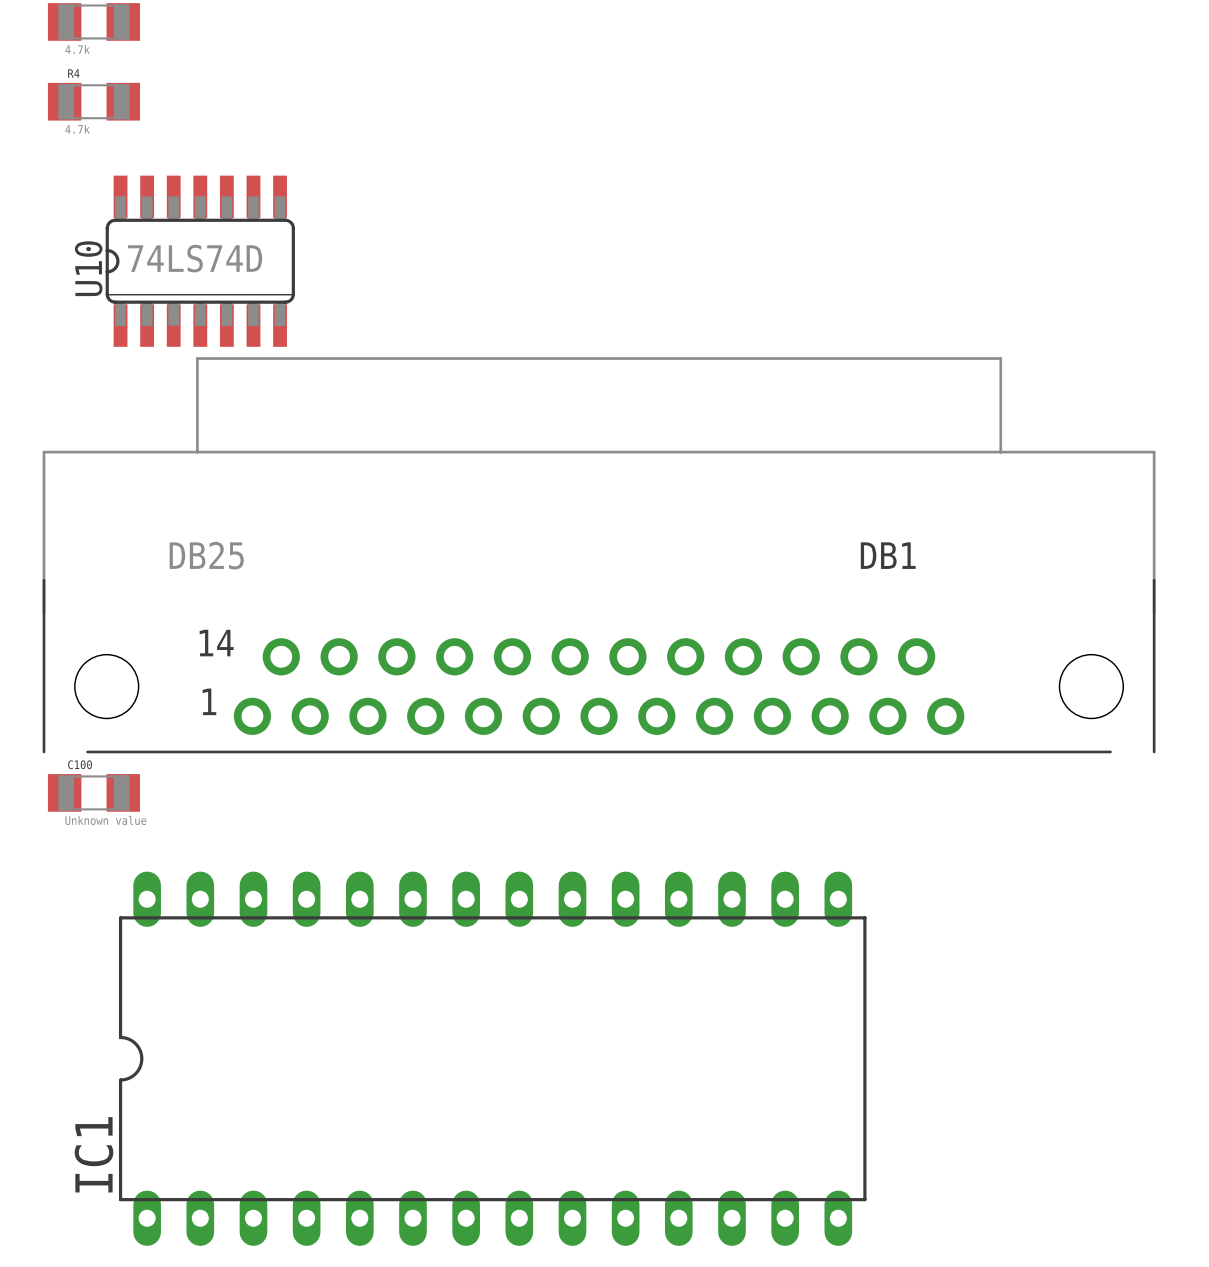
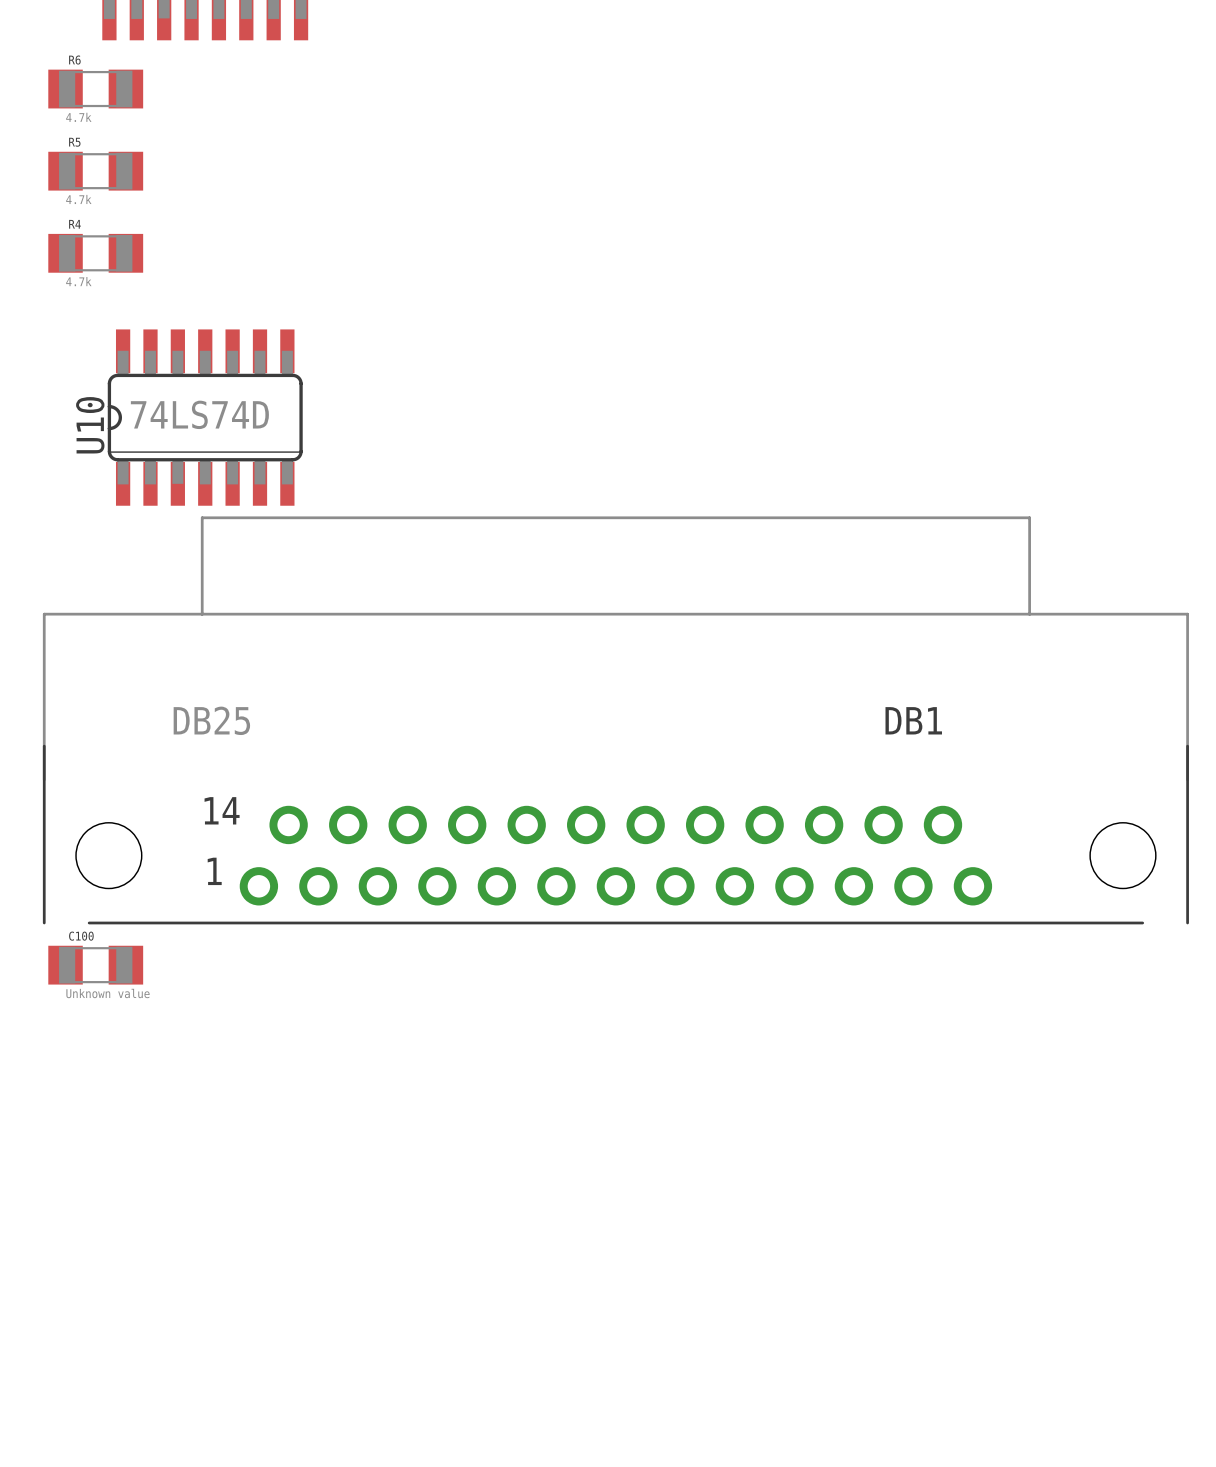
IC1: (492, 1058) -> none

